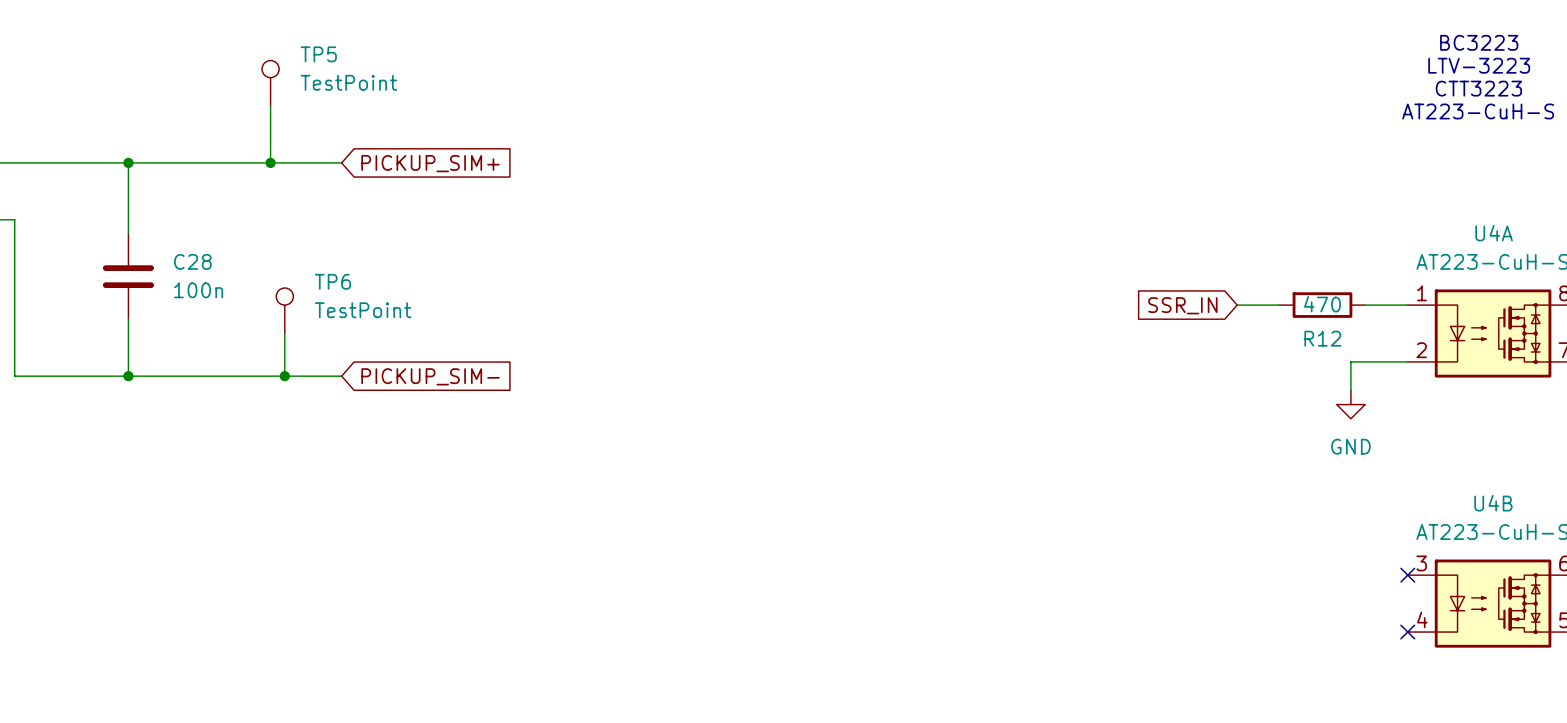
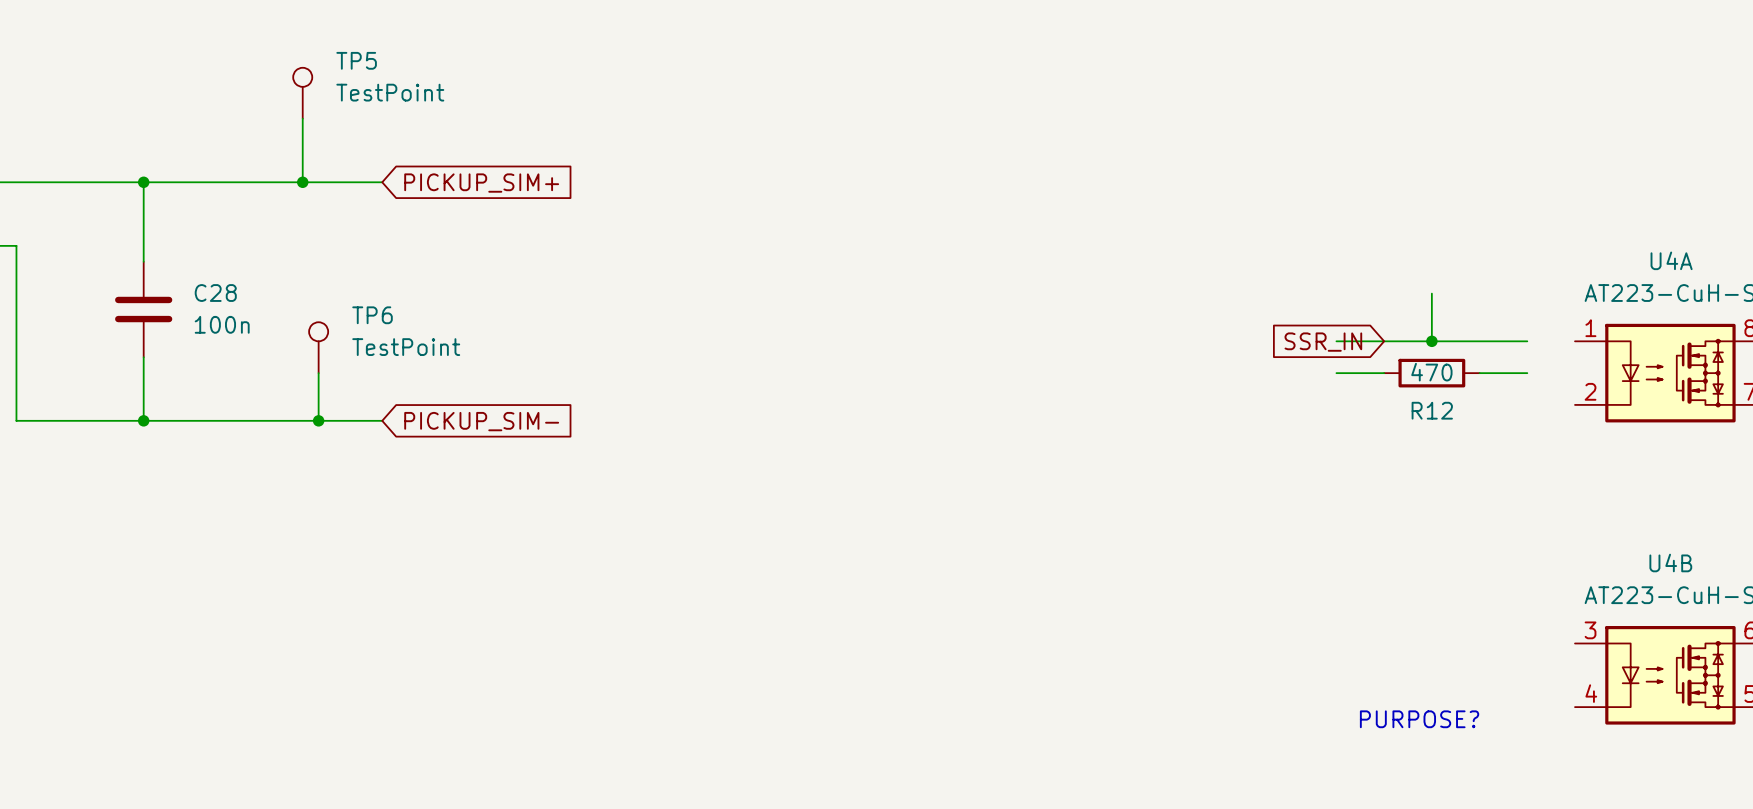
text: BC3223 (1479, 42) -> none
text: LTV-3223 (1479, 65) -> none
text: CTT3223 (1478, 88) -> none
text: AT223-CuH-S (1478, 111) -> none
wire: none -> (1336, 341) (1384, 341)
junction: none -> (1431, 341)
R12 position: (1322, 305) -> (1431, 373)
wire: (1365, 305) (1407, 305) -> (1527, 341) (1431, 341) (1431, 293)
wire: none -> (1336, 373) (1384, 373)
wire: none -> (1479, 373) (1527, 373)
wire: (1407, 361) (1350, 361) (1350, 390) -> none
power symbol: GND (1350, 404) -> none
no-connect mark: (1407, 575) -> none
no-connect mark: (1407, 632) -> none
text: none -> PURPOSE? (1419, 719)

